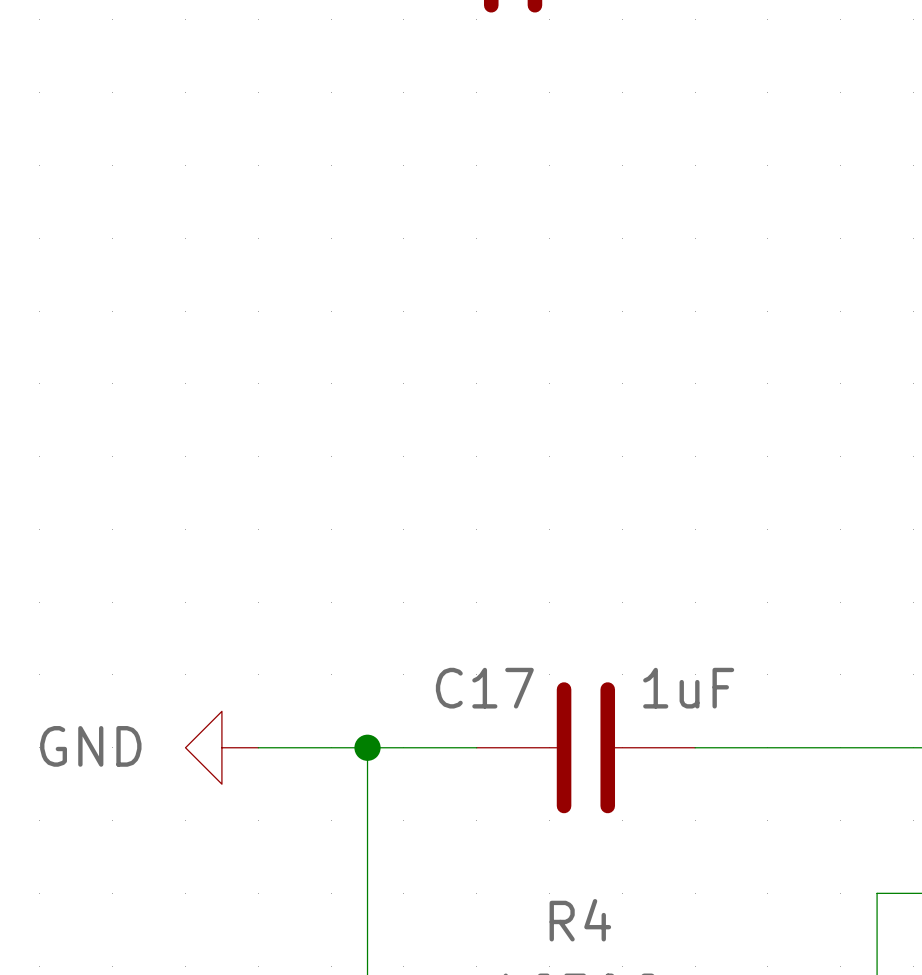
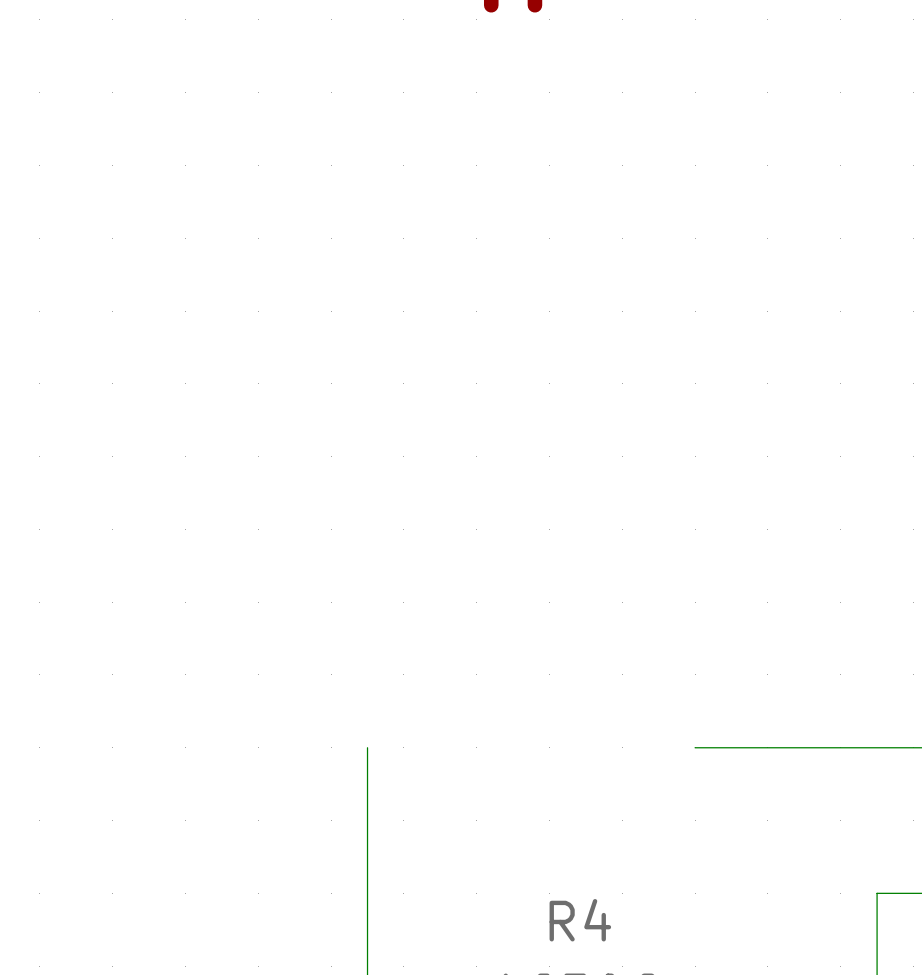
power symbol: GND (221, 747) -> none
wire: (258, 747) (476, 747) -> none
junction: (367, 747) -> none
C17: 1uF (585, 747) -> none

